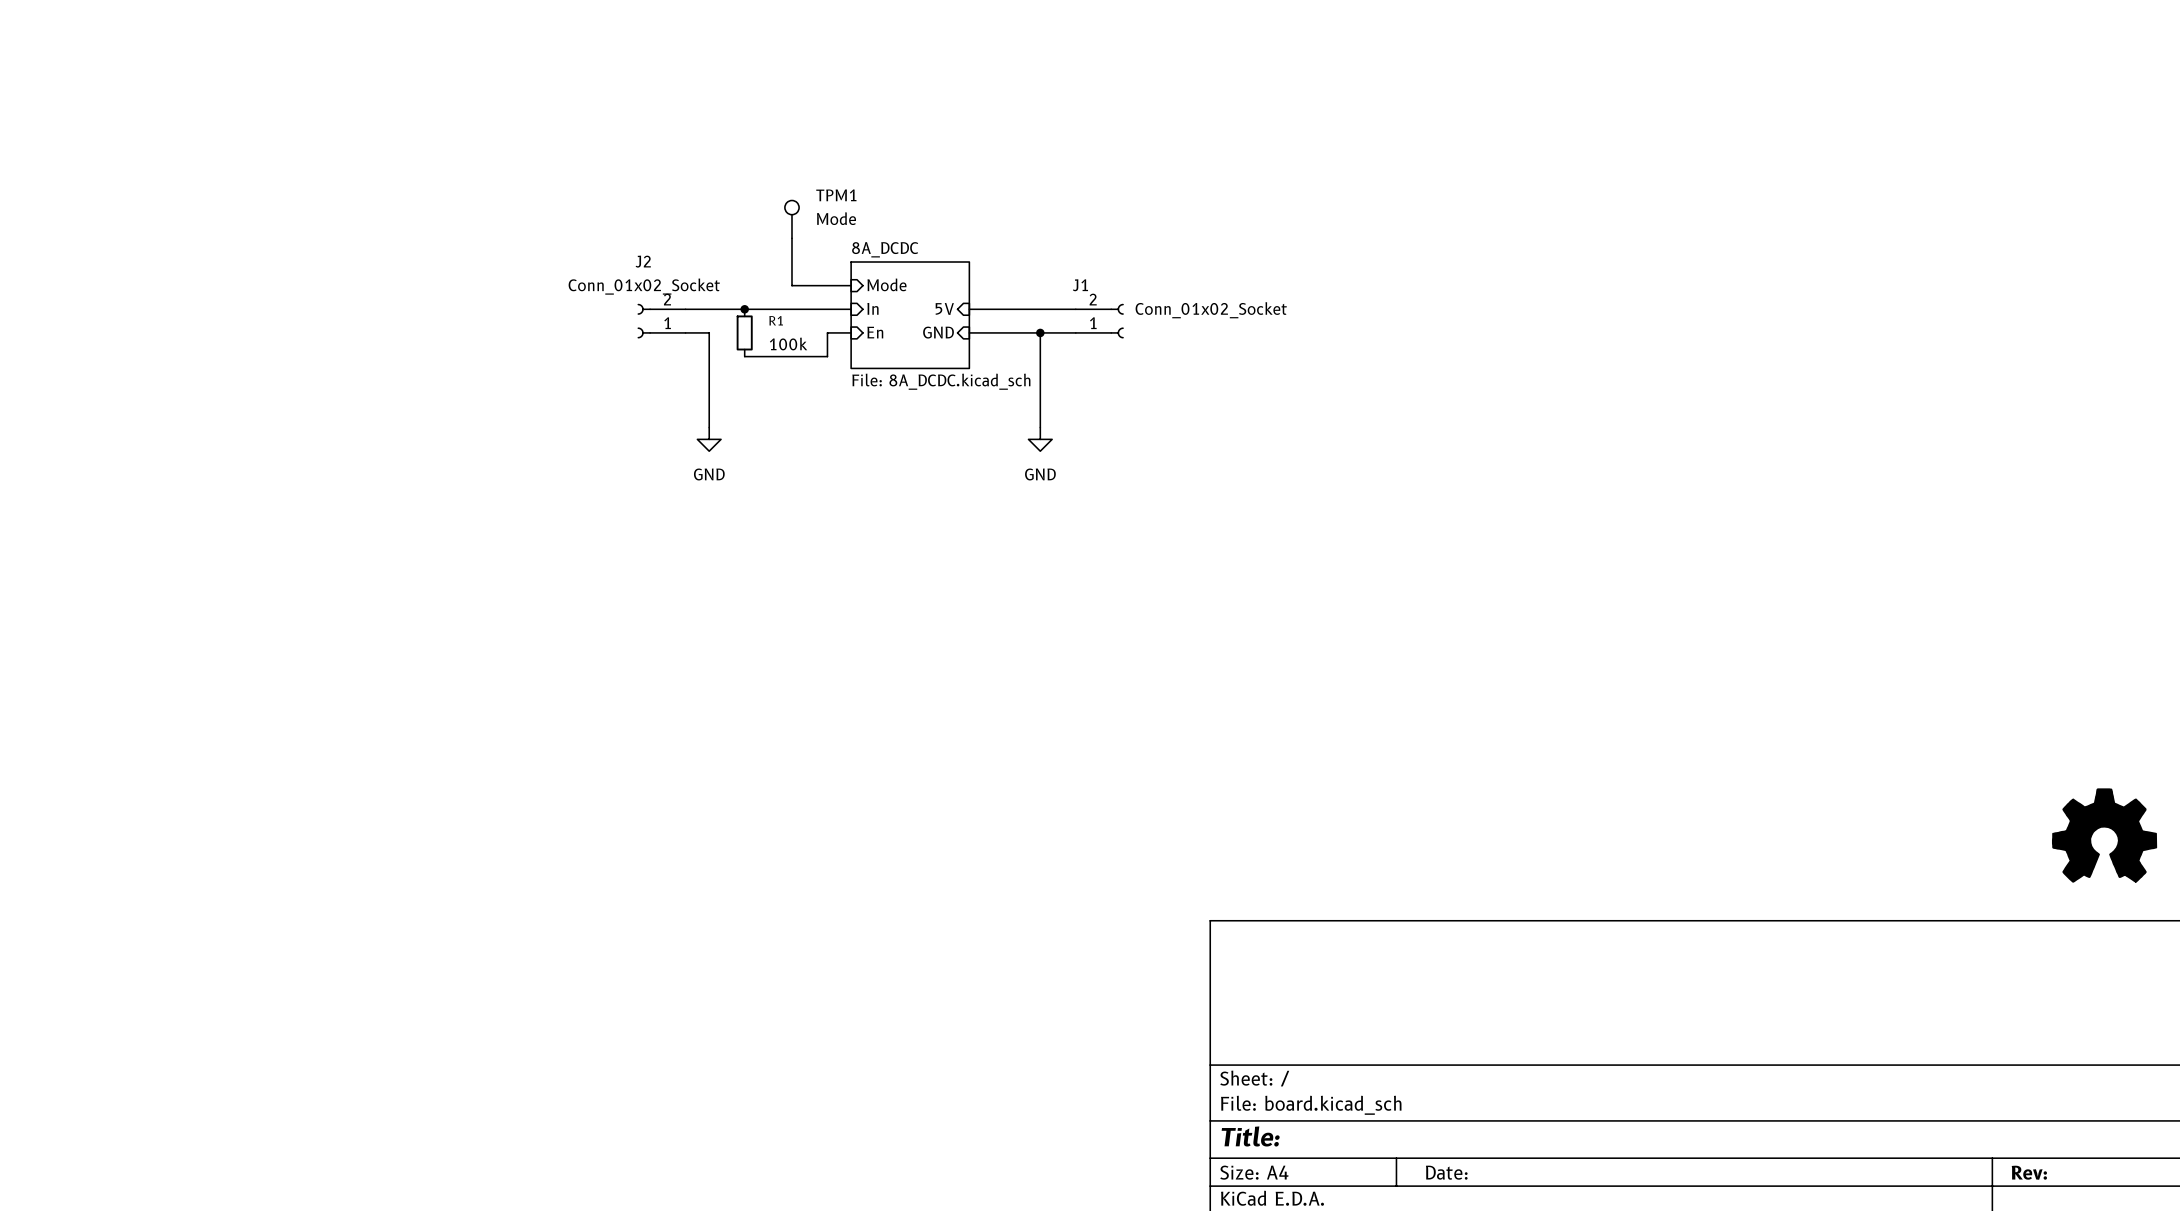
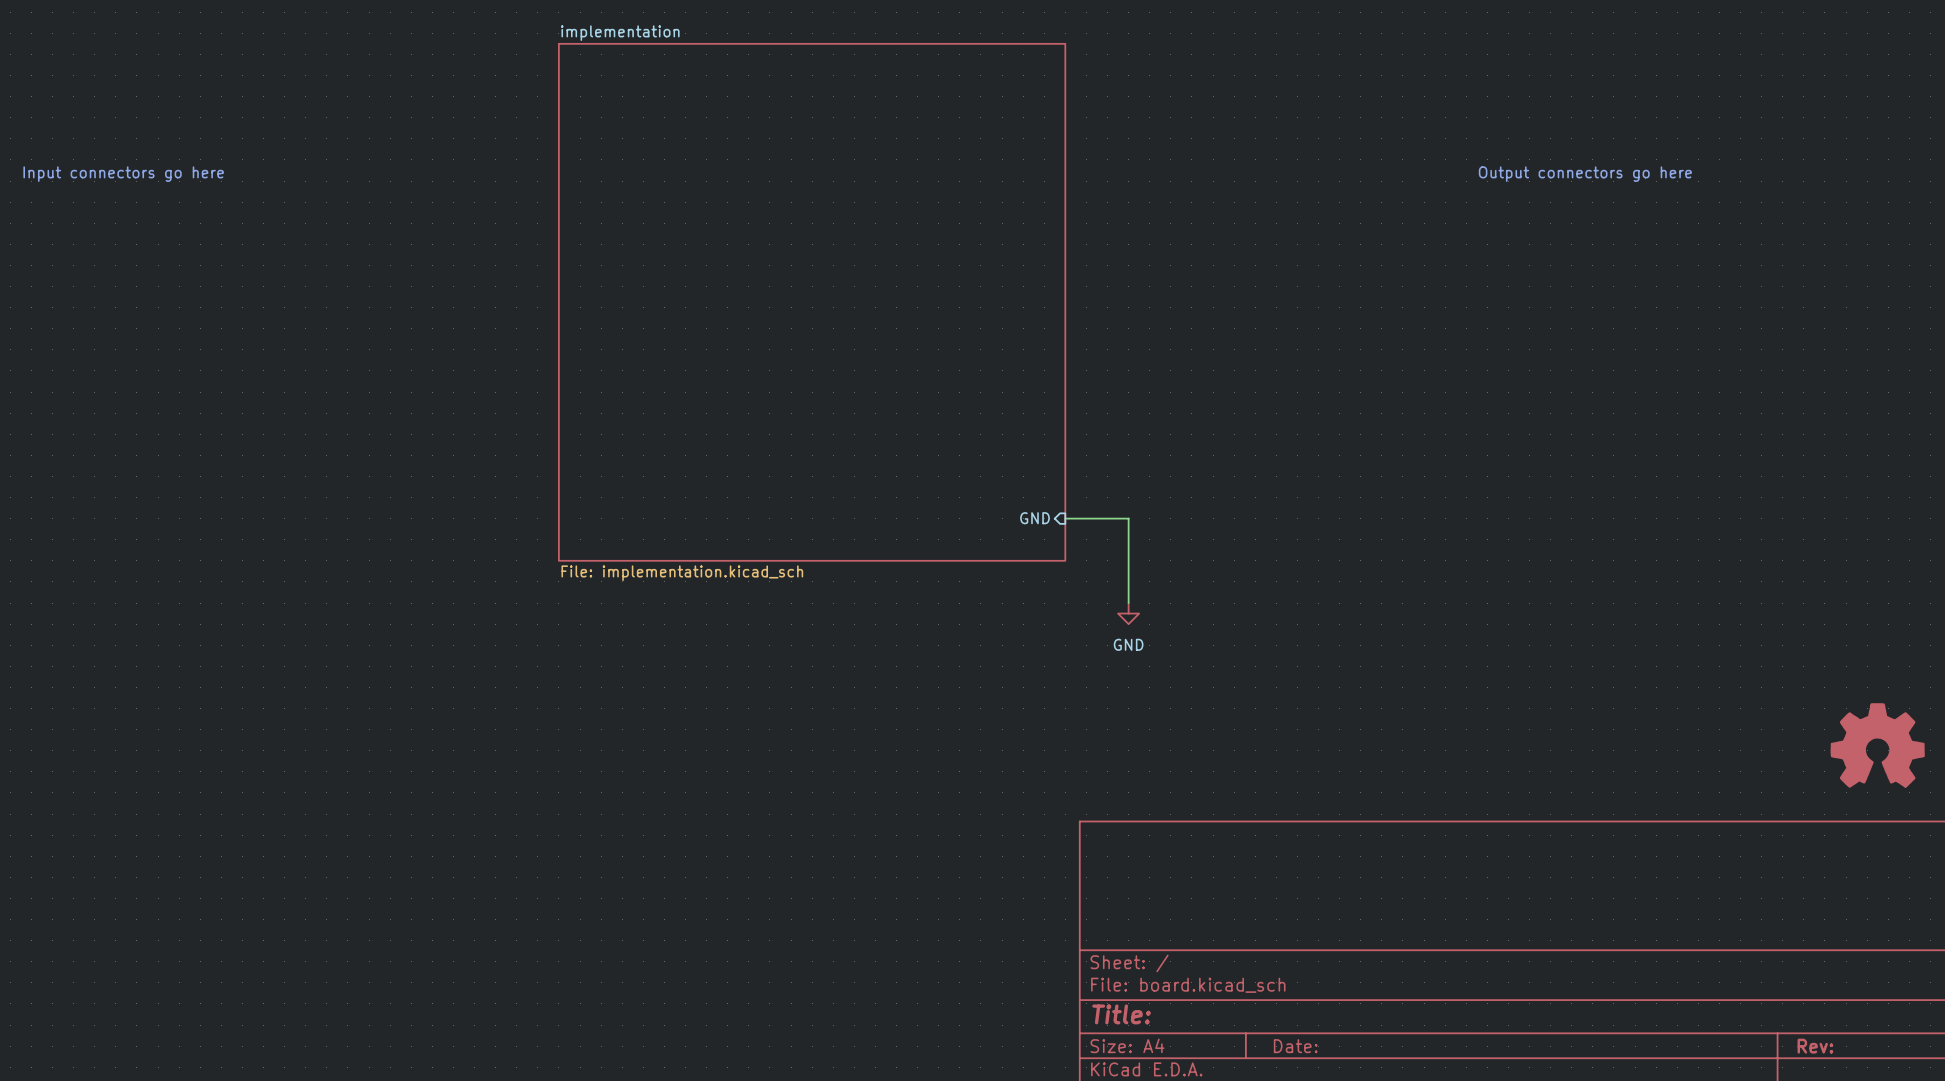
text: none -> Input connectors go here (123, 174)
text: none -> Output connectors go here (1585, 174)
TPM1: Mode (791, 219) -> none
wire: (791, 238) (791, 285) (851, 285) -> none
sheet pin: Mode (886, 284) -> none
sheet pin: In (872, 308) -> none
sheet pin: 5V (944, 308) -> none
wire: (685, 309) (851, 309) -> none
junction: (744, 309) -> none
wire: (969, 309) (1075, 309) -> none
sheet 8A_DCDC: File: 8A_DCDC.kicad_sch (910, 315) -> none
J2: Conn_01x02_Socket (661, 321) -> none
J1: Conn_01x02_Socket (1099, 321) -> none
wire: (685, 332) (709, 332) (709, 427) -> none
R1: 100k (744, 332) -> none
wire: (851, 332) (827, 332) (827, 356) (744, 356) -> none
sheet pin: En (875, 332) -> none
sheet pin: GND (938, 332) -> none
wire: (969, 332) (1075, 332) -> none
wire: (1040, 332) (1040, 427) -> none
junction: (1040, 332) -> none
sheet implementation: none -> File: implementation.kicad_sch (812, 302)
power symbol: GND (709, 439) -> none
power symbol: GND (1040, 439) -> none
sheet pin: none -> GND (1035, 518)
wire: none -> (1065, 518) (1128, 518) (1128, 603)
power symbol: none -> GND (1128, 613)

